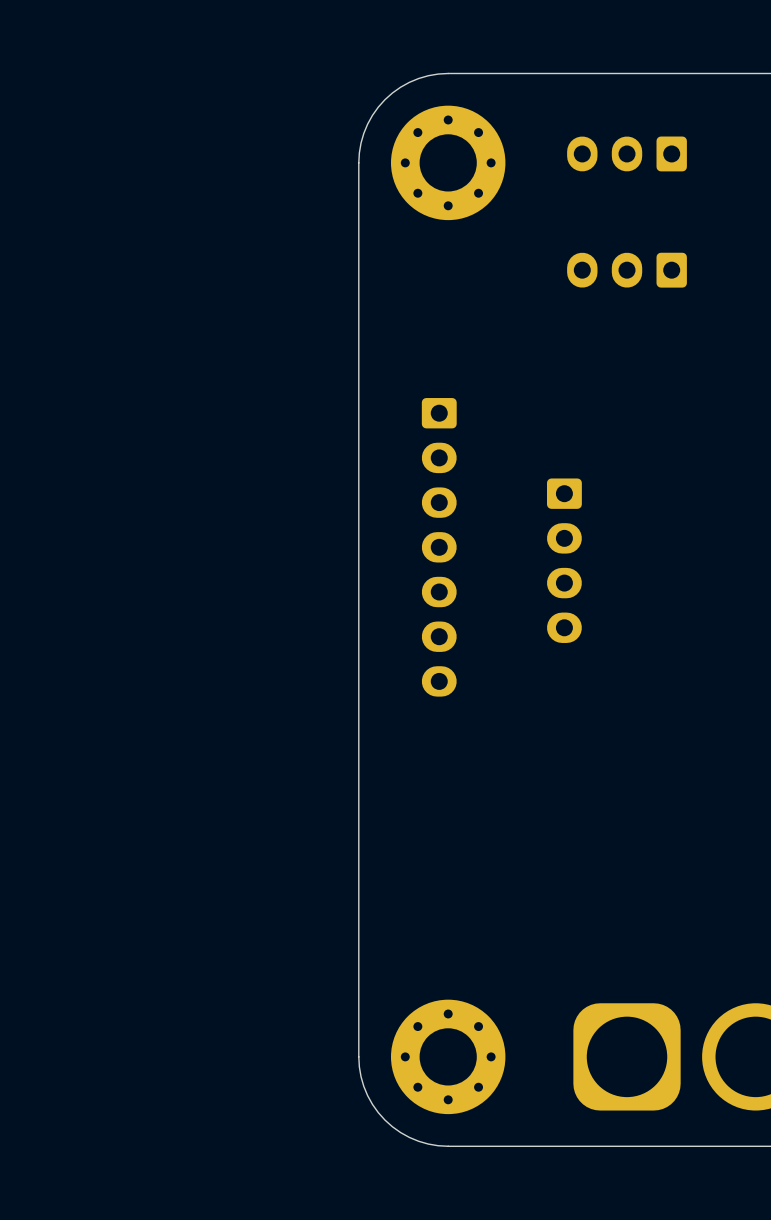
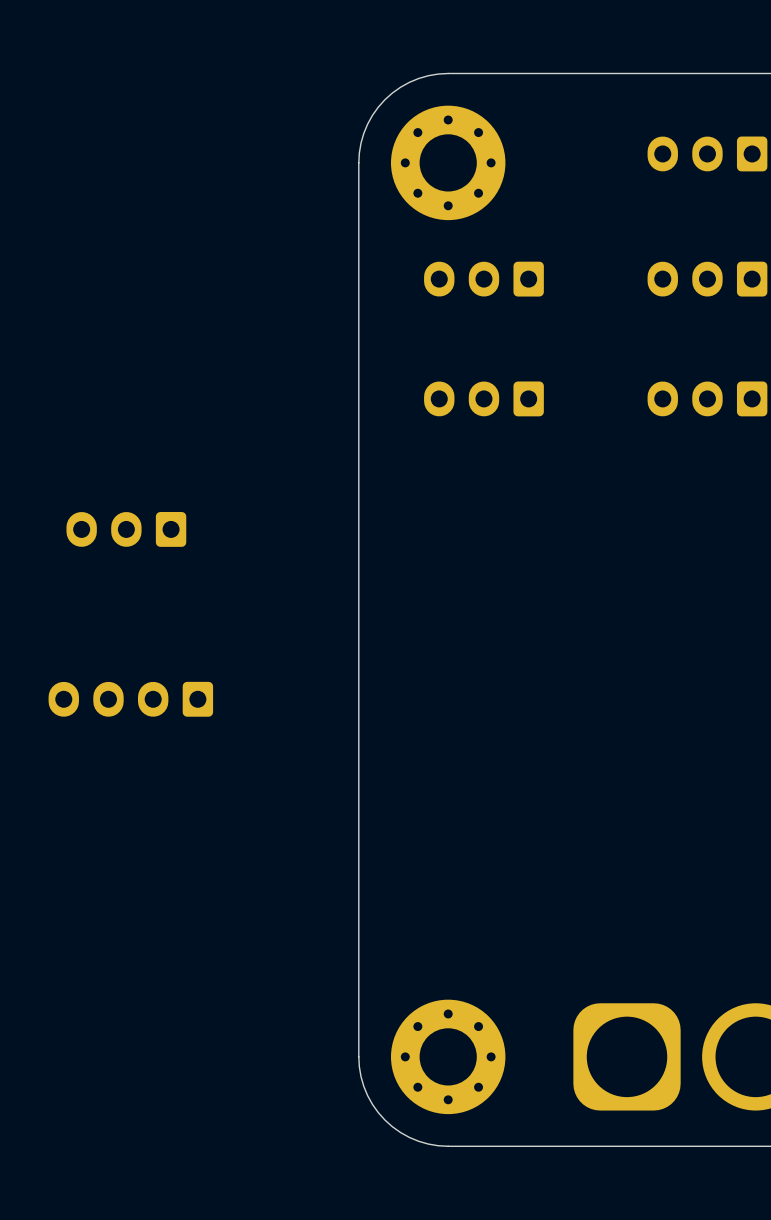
part: (627, 153) -> none
part: none -> (707, 153)
part: (627, 270) -> none
part: none -> (483, 279)
part: none -> (707, 279)
part: none -> (483, 398)
part: none -> (707, 398)
part: none -> (126, 529)
part: (439, 547) -> none
part: (564, 560) -> none
part: none -> (130, 699)

